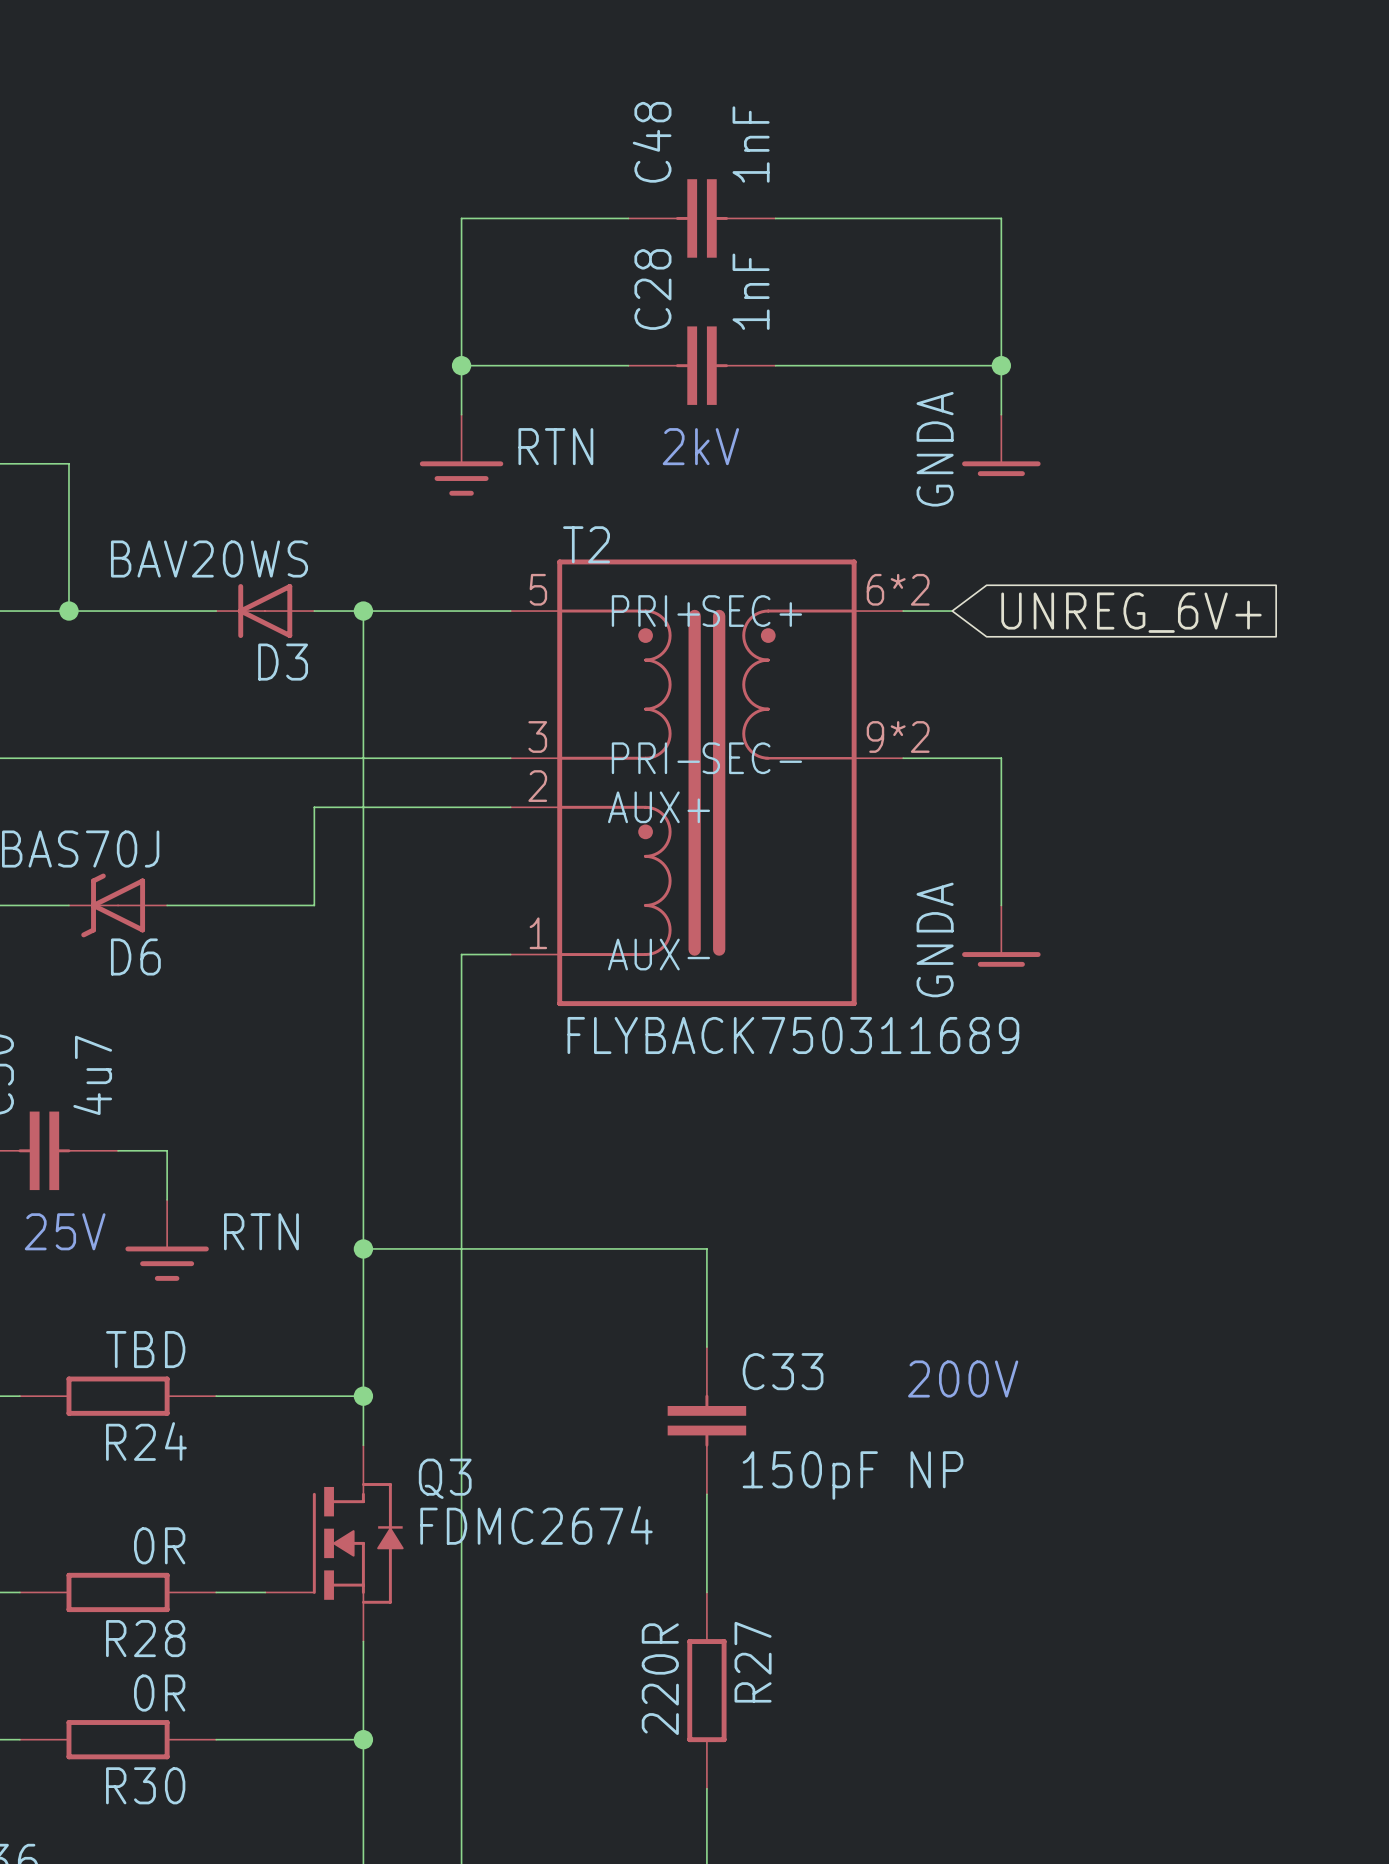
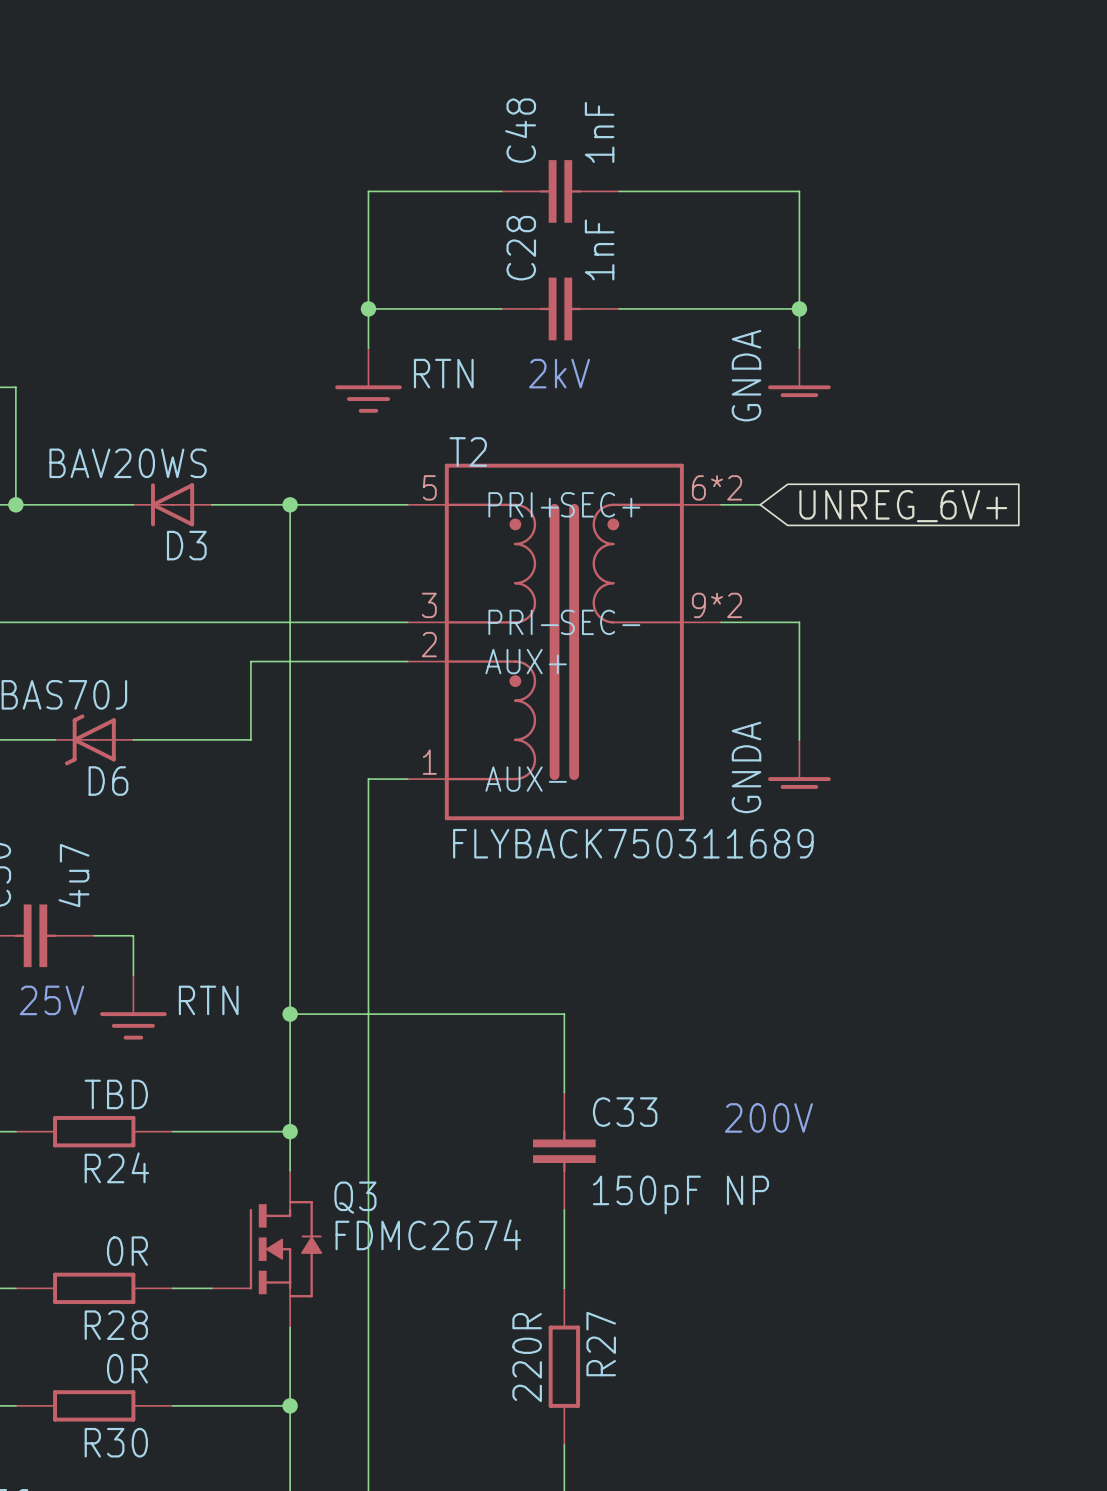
wire: (19, 463) (68, 463) (68, 611) -> (15, 387) (15, 504)
junction position: (68, 611) -> (15, 504)
D3 position: (265, 611) -> (172, 504)

